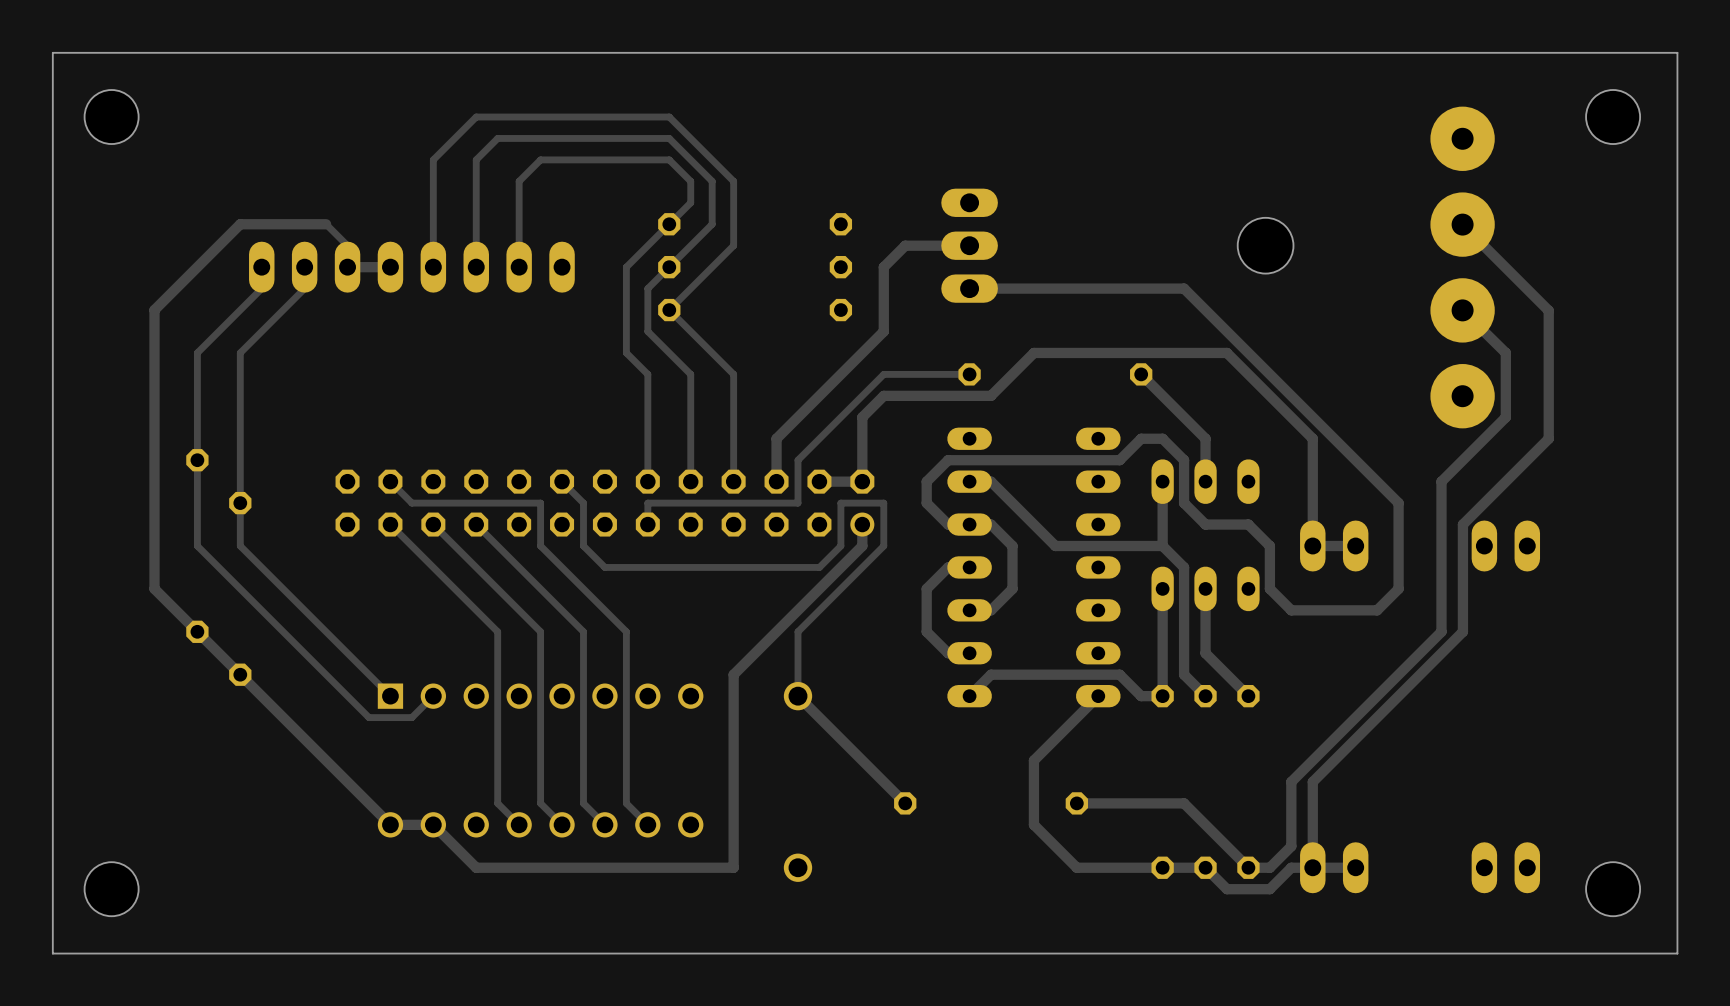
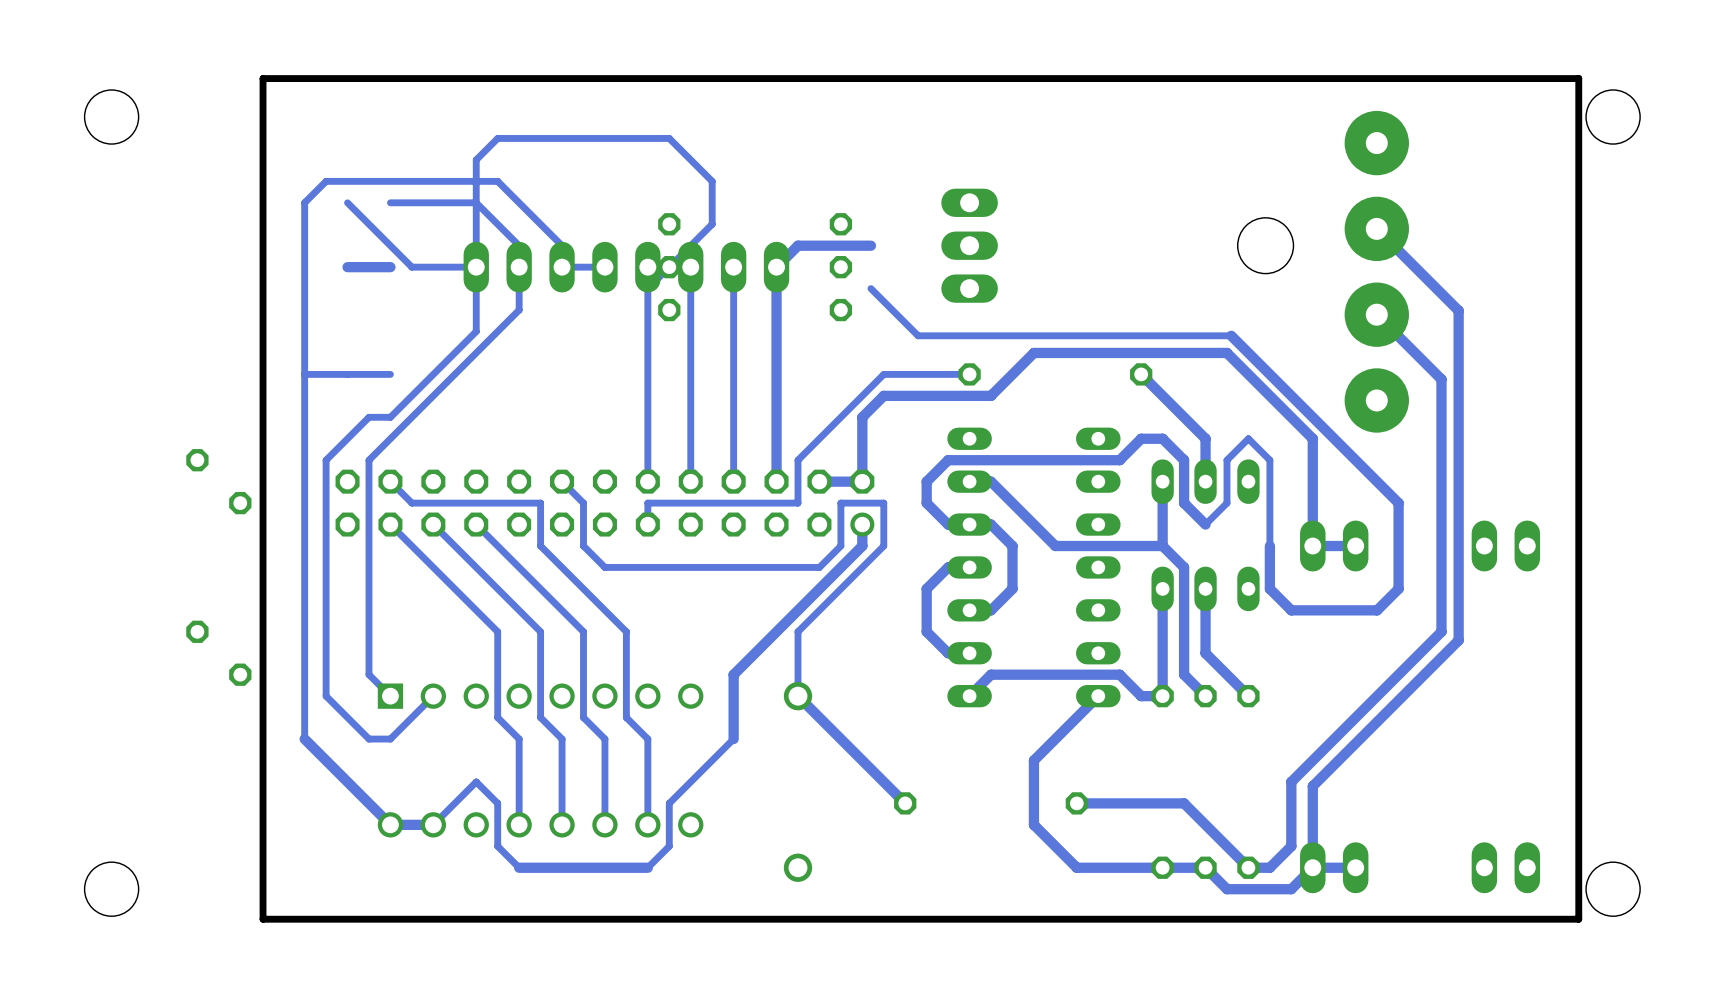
board edge: (1677, 52) (52, 52) (52, 953) (1677, 953) (1677, 52) -> (1578, 78) (1578, 919) (263, 919) (263, 78) (1578, 78)
track: (1441, 224) (1462, 224) (1548, 310) (1548, 438) (1462, 524) (1462, 631) (1312, 781) (1312, 786) -> (1376, 228) (1458, 310) (1458, 640) (1312, 786)
track: (347, 245) (326, 224) (240, 224) (154, 310) (154, 588) (304, 739) -> (304, 288) (304, 739)
track: (519, 245) (519, 181) (540, 159) (669, 159) (690, 181) (690, 202) (626, 267) (626, 352) (647, 374) -> (519, 245) (476, 202) (390, 202)
track: (969, 245) (905, 245) (883, 267) (883, 331) (776, 438) -> (870, 245) (797, 245) (776, 267) (776, 438)
track: (261, 267) (261, 288) (197, 352) (197, 546) (369, 717) (411, 717) -> (347, 202) (411, 267) (476, 267) (476, 331) (390, 417) (369, 417) (326, 460) (326, 696) (369, 739) (390, 739) (411, 717)
part: (326, 267) -> none
track: (433, 267) (433, 159) (476, 117) (669, 117) (733, 181) (733, 245) (669, 310) (733, 374) -> (733, 267) (733, 374)
part: (497, 267) -> none
part: none -> (540, 267)
track: none -> (604, 267) (562, 267) (562, 245) (497, 181) (326, 181) (304, 202) (304, 267)
track: none -> (690, 267) (690, 374)
part: none -> (712, 267)
part position: (1462, 267) -> (1376, 271)
track: (304, 288) (240, 352) (240, 546) (369, 674) -> (519, 267) (519, 310) (369, 460) (369, 674)
track: (969, 288) (1184, 288) (1231, 335) -> (870, 288) (918, 335) (1231, 335)
track: (1462, 310) (1505, 352) (1505, 417) (1441, 481) -> (1376, 314) (1441, 379) (1441, 481)
track: (647, 331) (690, 374) -> (647, 331) (647, 374)
track: none -> (390, 374) (304, 374)
track: (1205, 524) (1248, 524) (1269, 546) -> (1205, 524) (1226, 503) (1226, 460) (1248, 438) (1269, 460) (1269, 546)
track: (497, 717) (497, 803) (519, 824) -> (497, 717) (519, 739) (519, 824)
track: (540, 717) (540, 803) (562, 824) -> (540, 717) (562, 739) (562, 824)
track: (583, 717) (583, 803) (604, 824) -> (583, 717) (604, 739) (604, 824)
track: (626, 717) (626, 803) (647, 824) -> (626, 717) (647, 739) (647, 824)
track: (733, 739) (733, 867) (647, 867) -> (733, 739) (669, 803) (669, 846) (647, 867)
track: (433, 824) (476, 867) (519, 867) -> (433, 824) (476, 781) (497, 803) (497, 846) (519, 867)
track: (1312, 867) (1291, 867) (1269, 889) -> (1312, 867) (1291, 889) (1269, 889)

